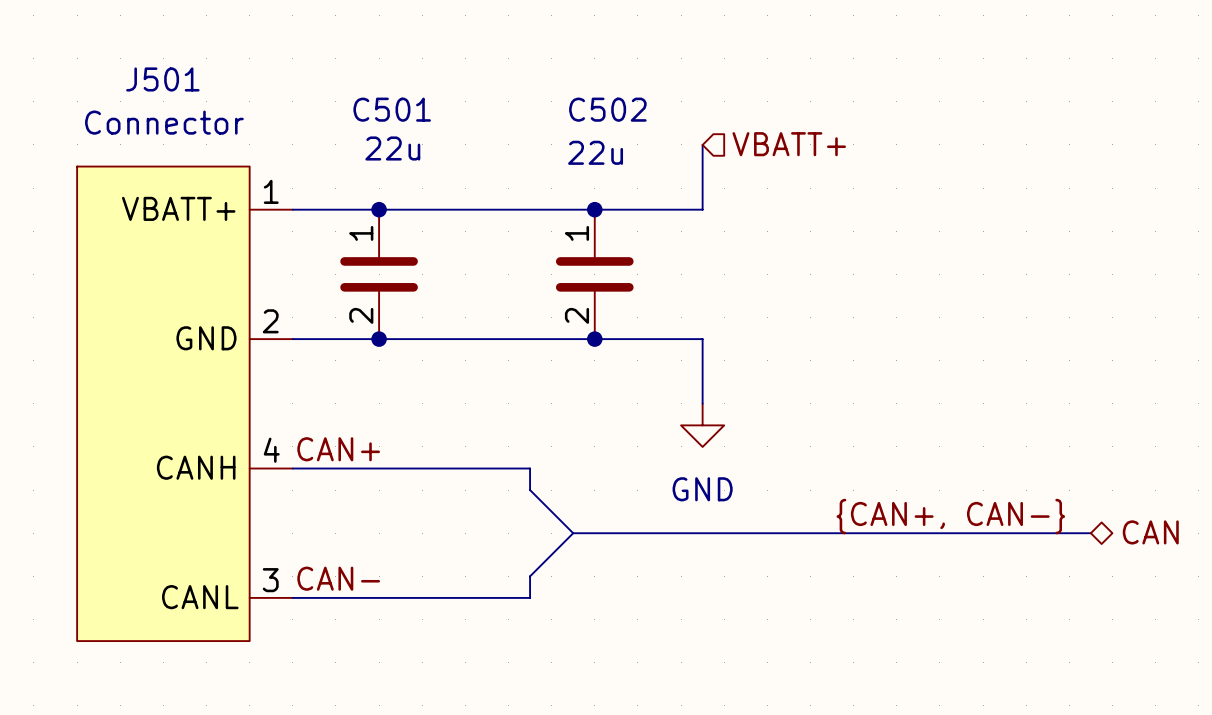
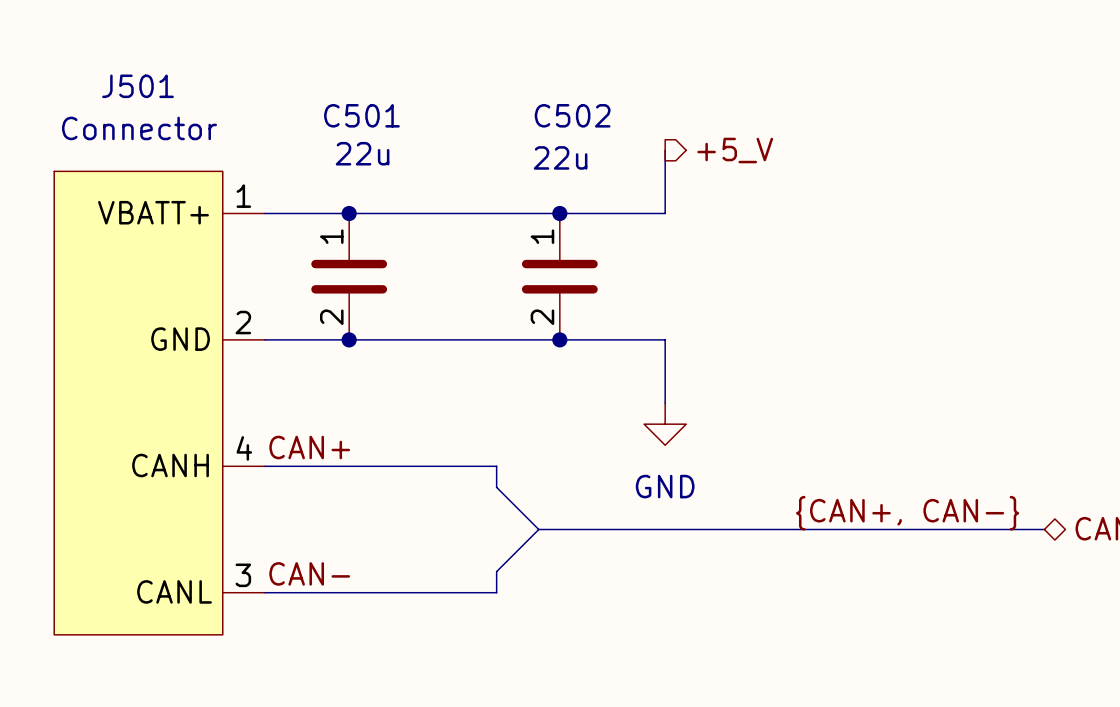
hierarchical label shape: input (789, 144) -> output (735, 150)
hierarchical label: VBATT+ (789, 144) -> +5_V (735, 150)

